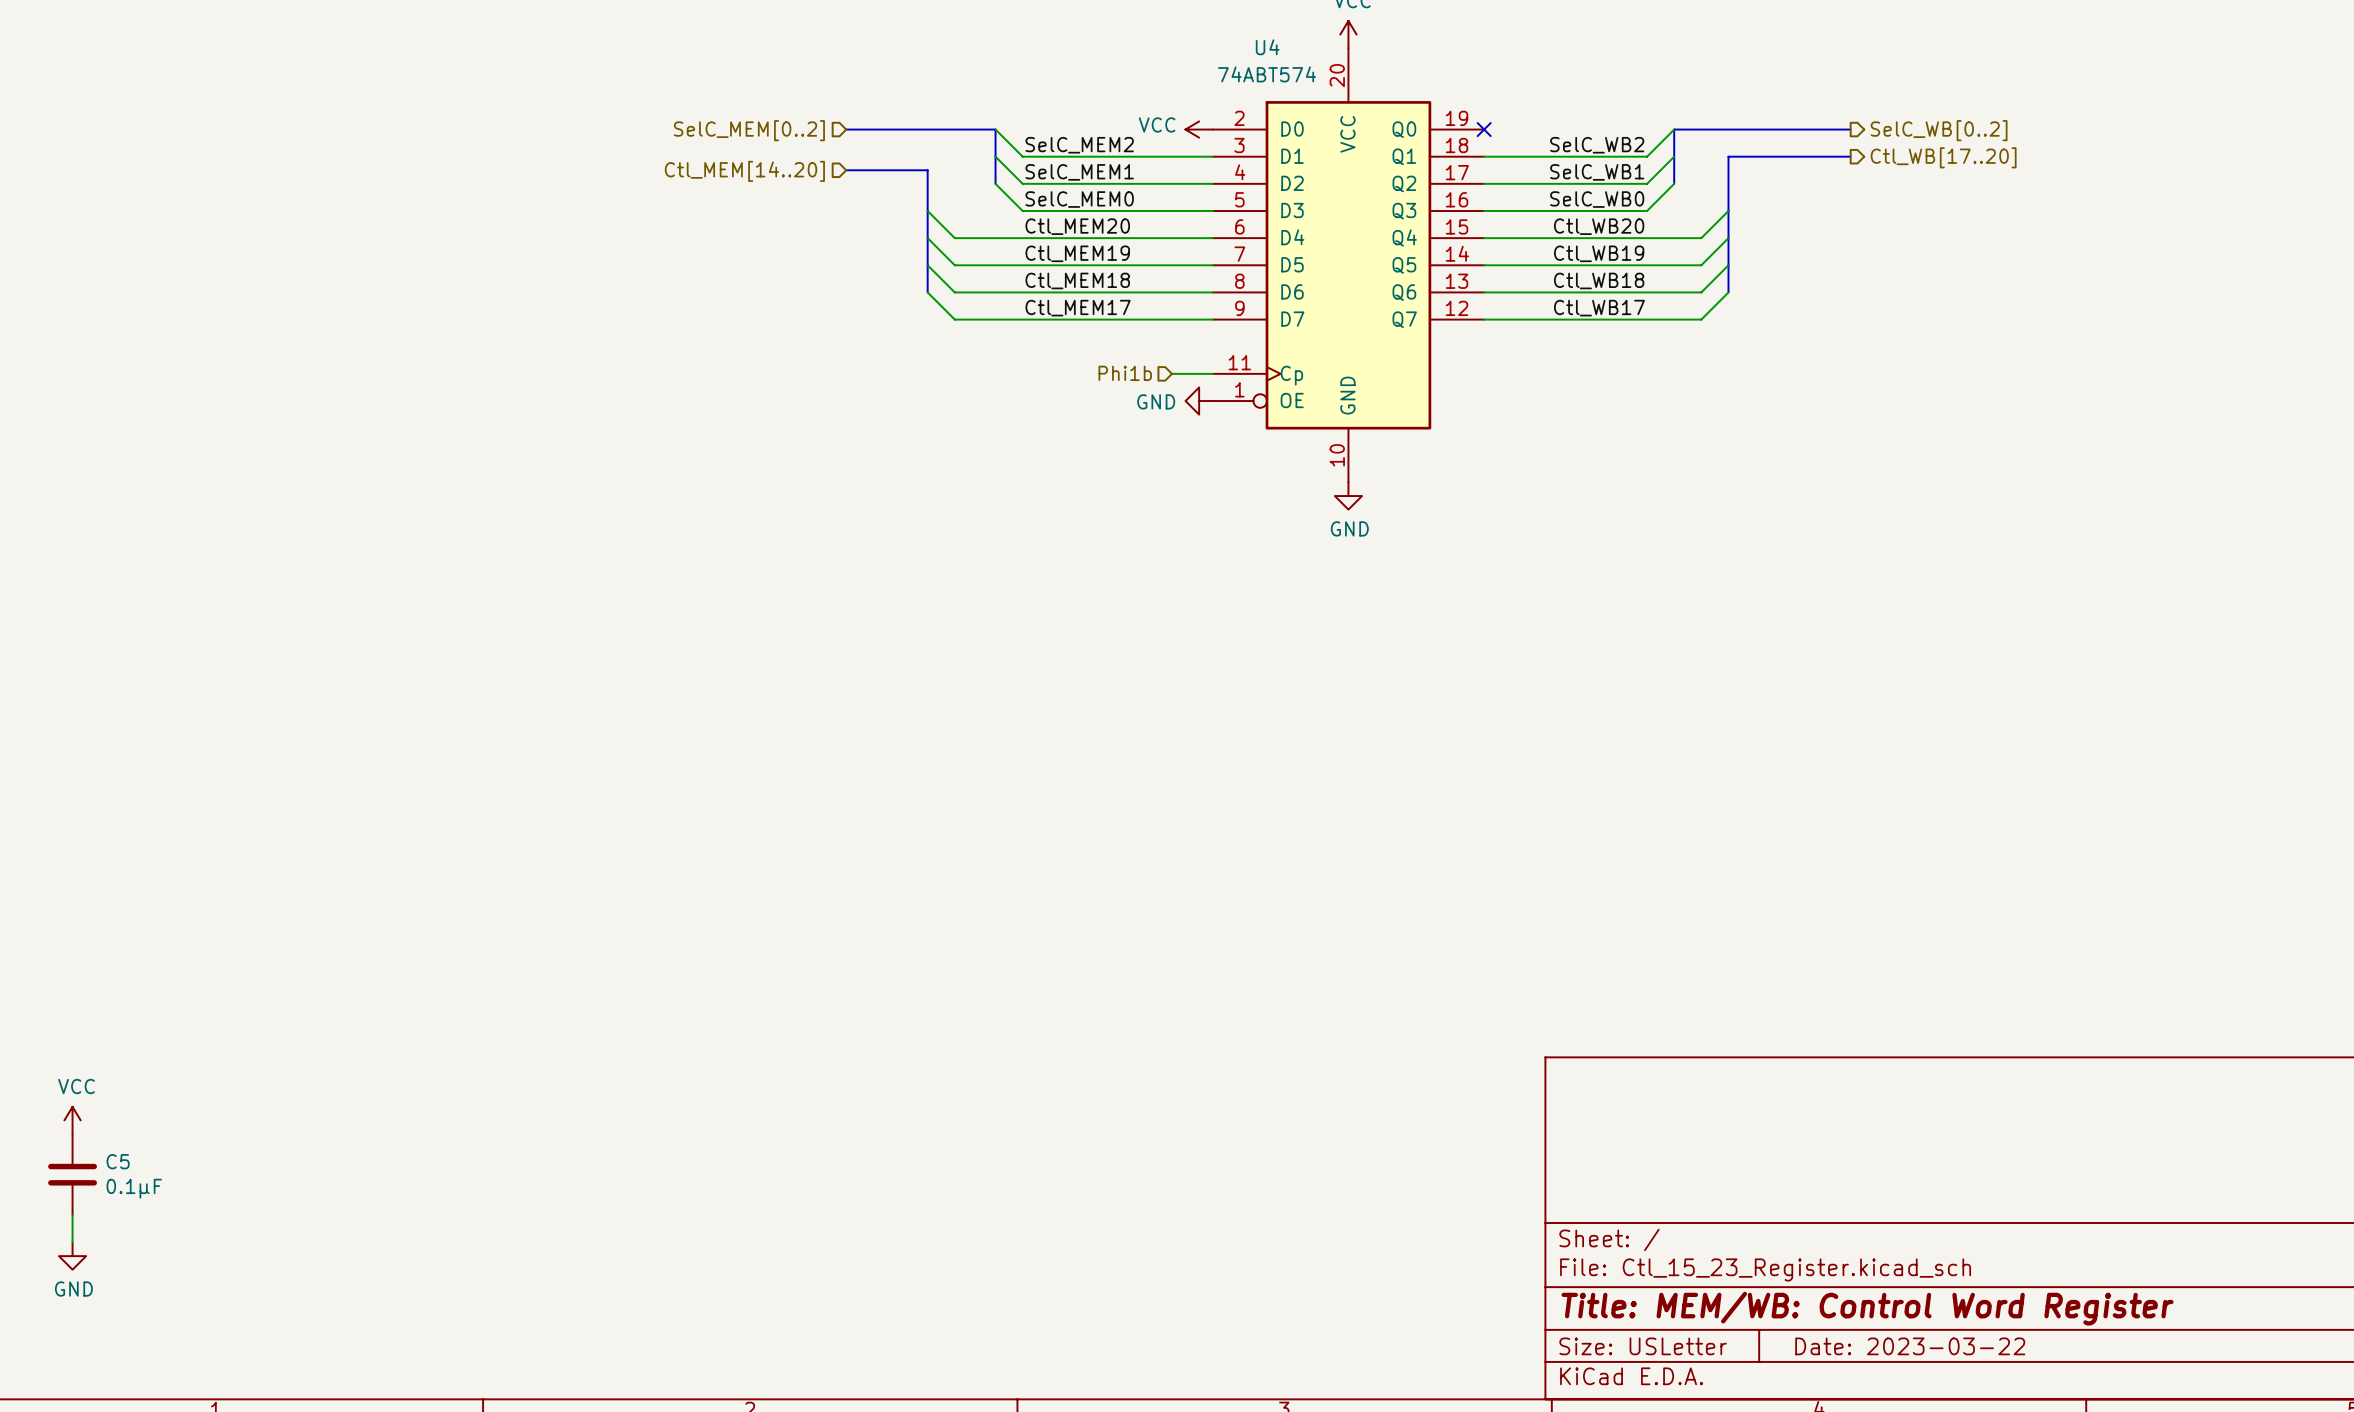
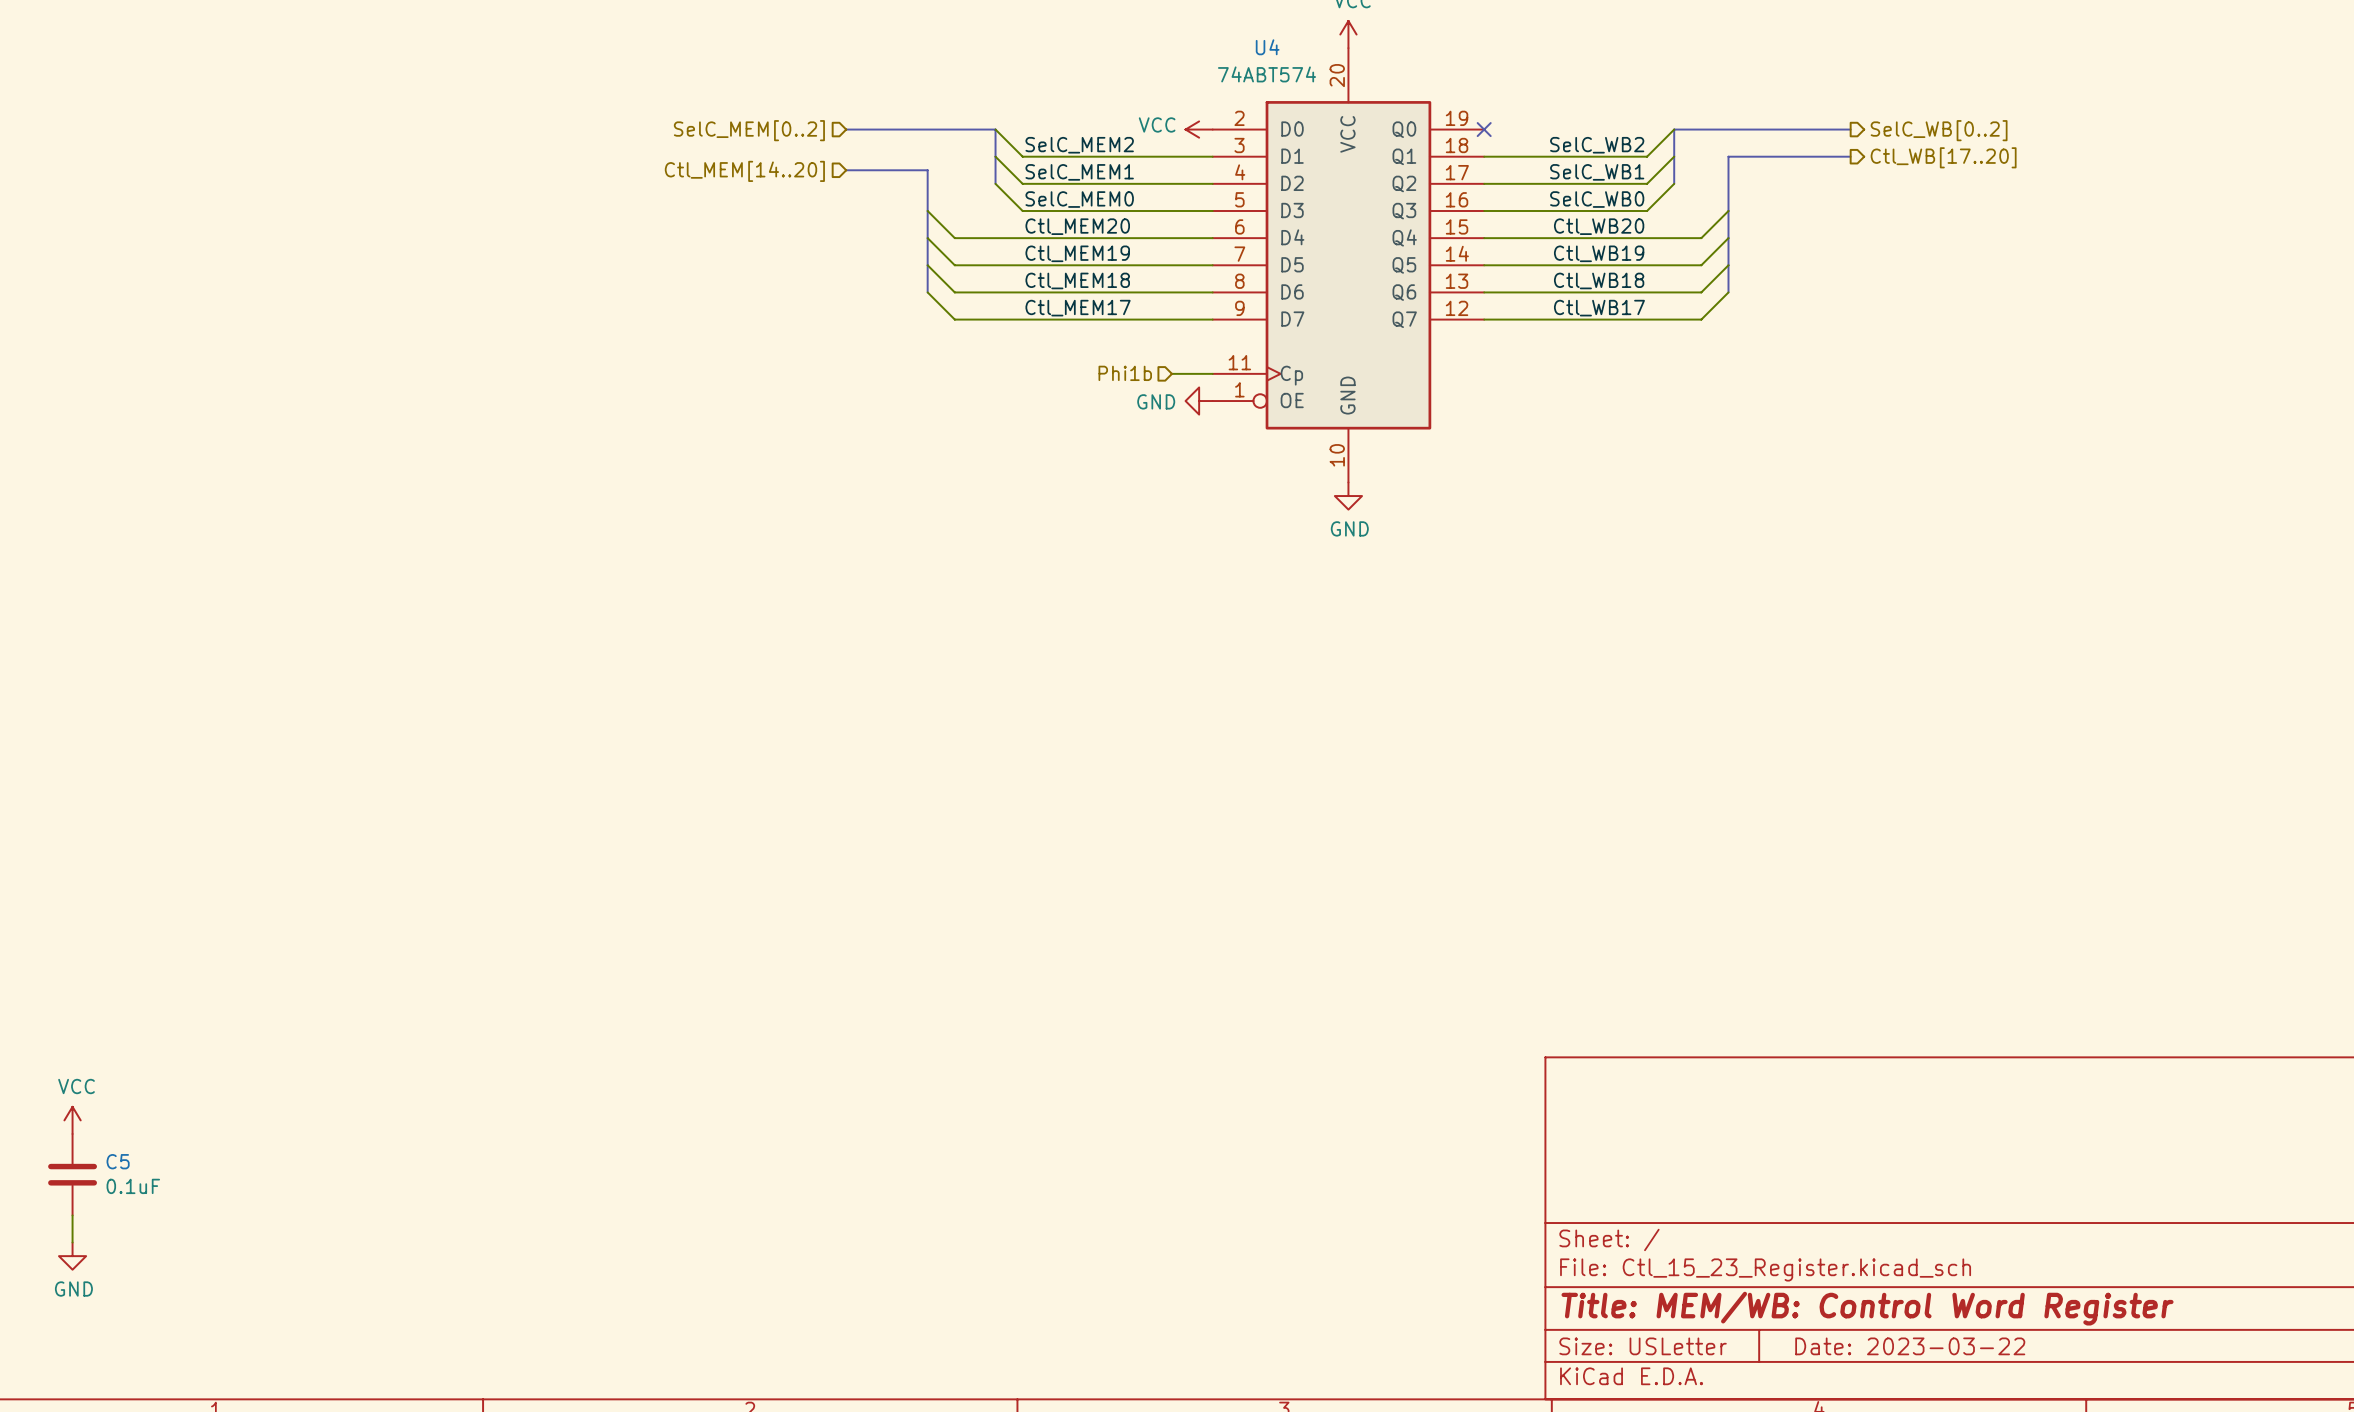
C5 value: 0.1μF (134, 1188) -> 0.1uF (133, 1186)

